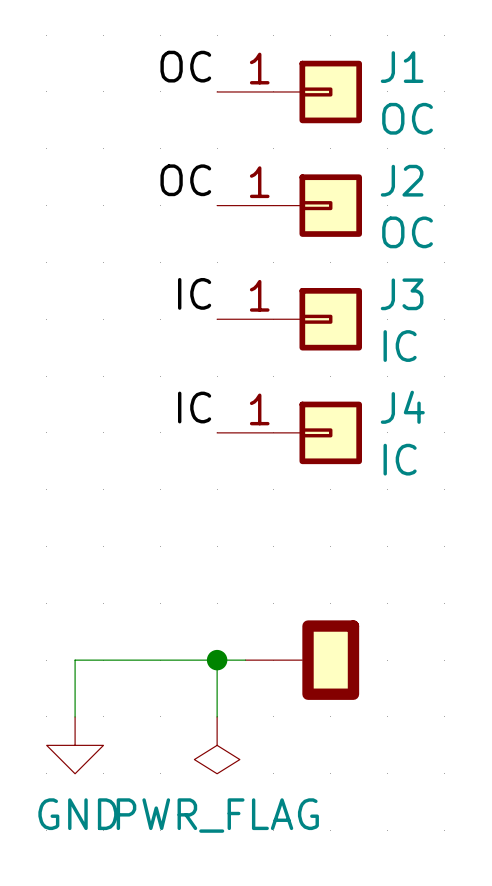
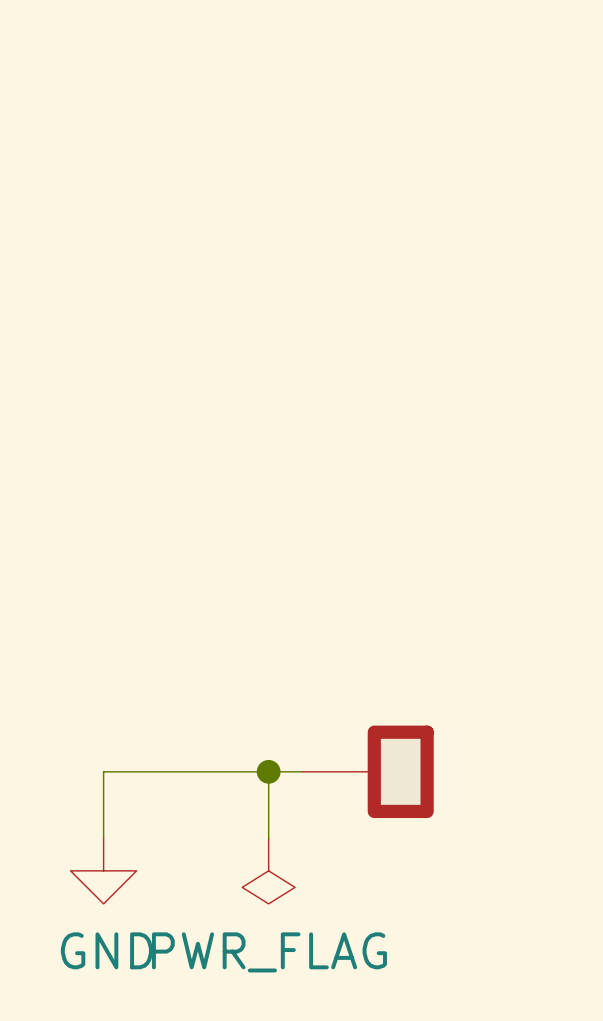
label: OC (185, 66) -> none
J1: OC (289, 91) -> none
label: OC (185, 180) -> none
J2: OC (289, 205) -> none
label: IC (194, 293) -> none
J3: IC (289, 319) -> none
label: IC (194, 407) -> none
J4: IC (289, 432) -> none

